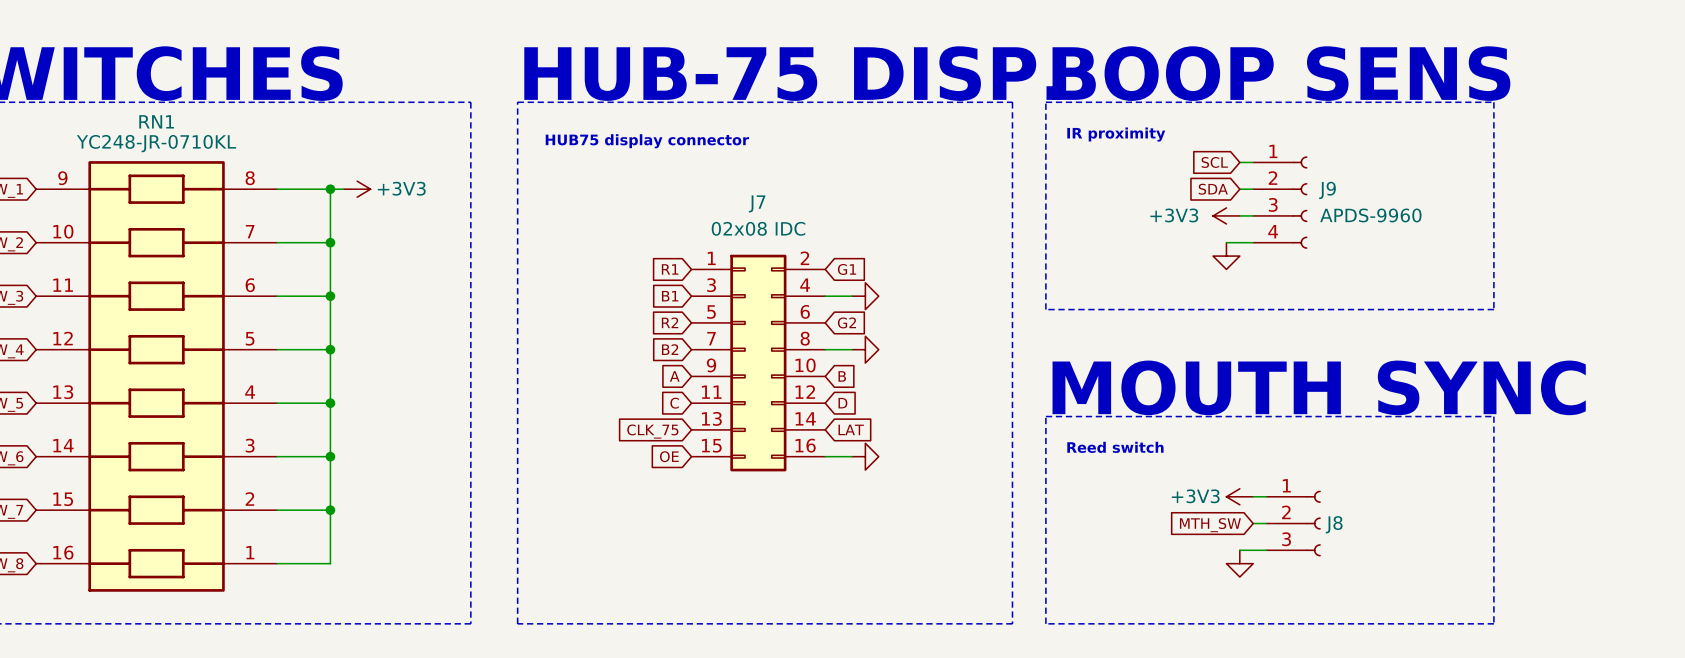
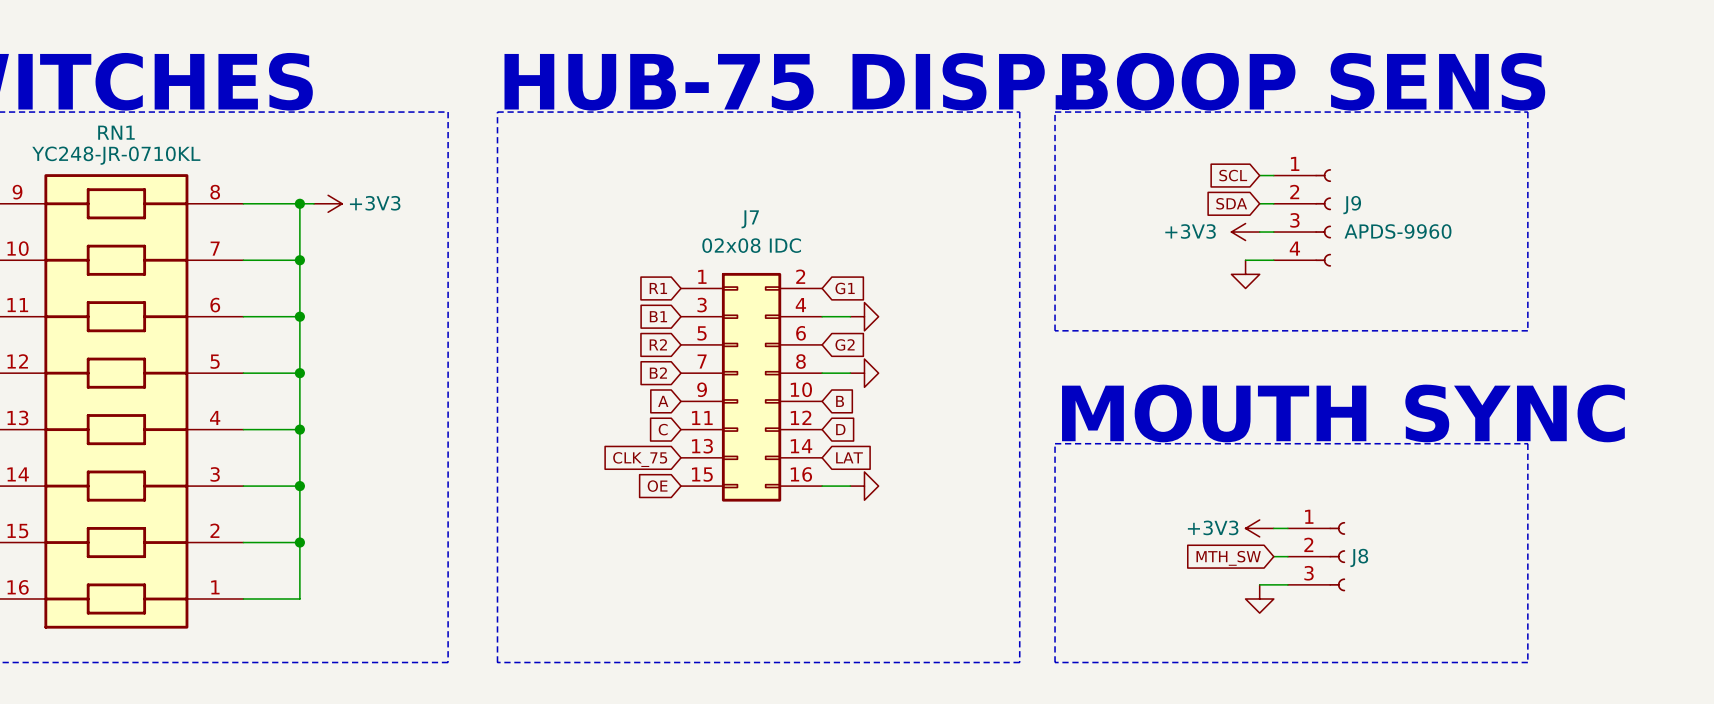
text: IR proximity (1116, 134) -> none
text: HUB75 display connector (647, 141) -> none
text: Reed switch (1115, 447) -> none

